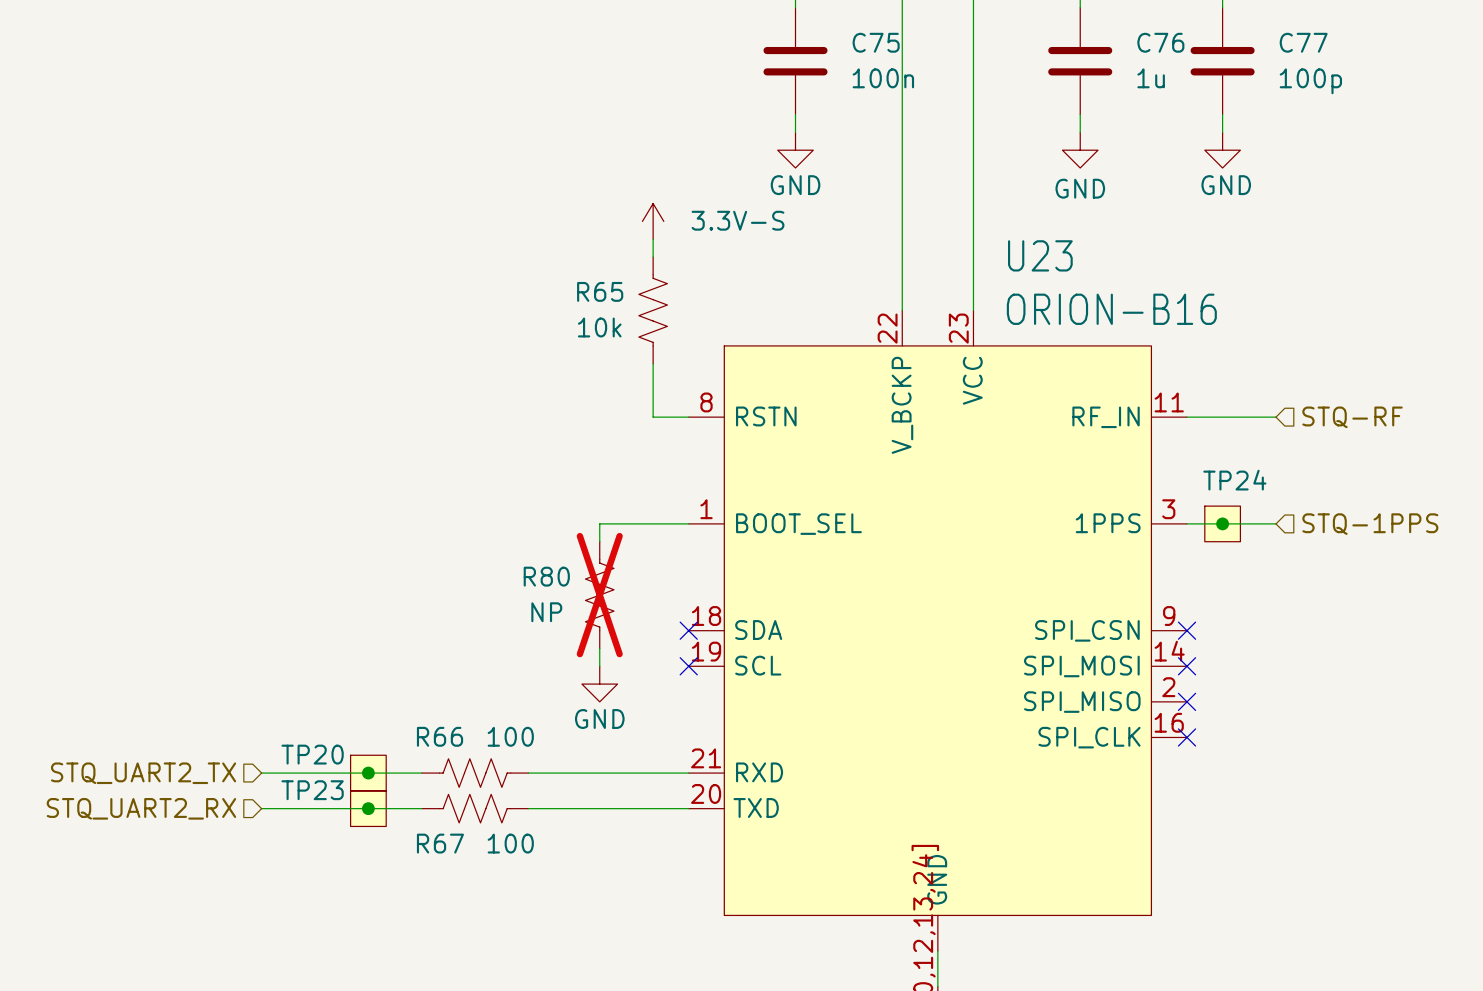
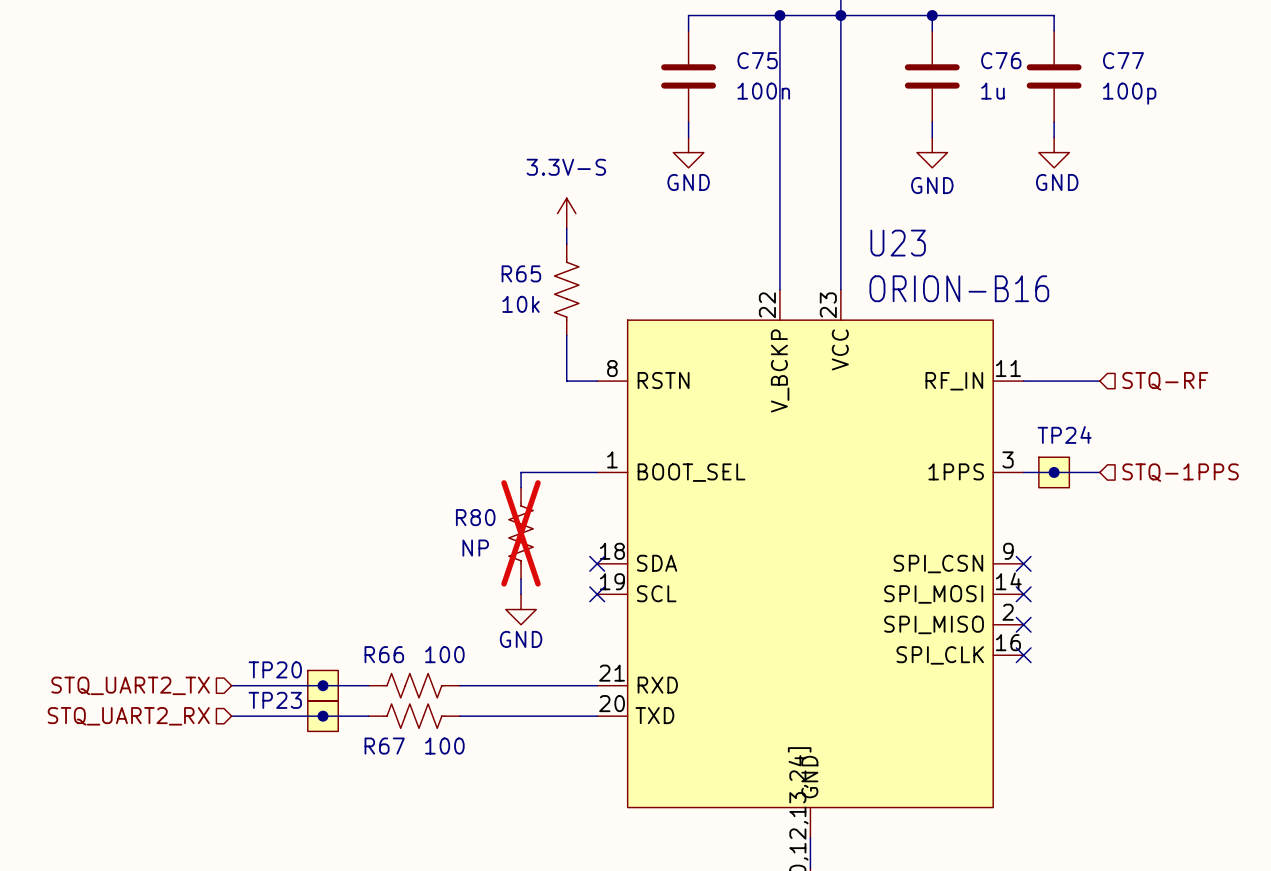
power symbol text position: 3.3V-S (738, 220) -> 3.3V-S (566, 167)

